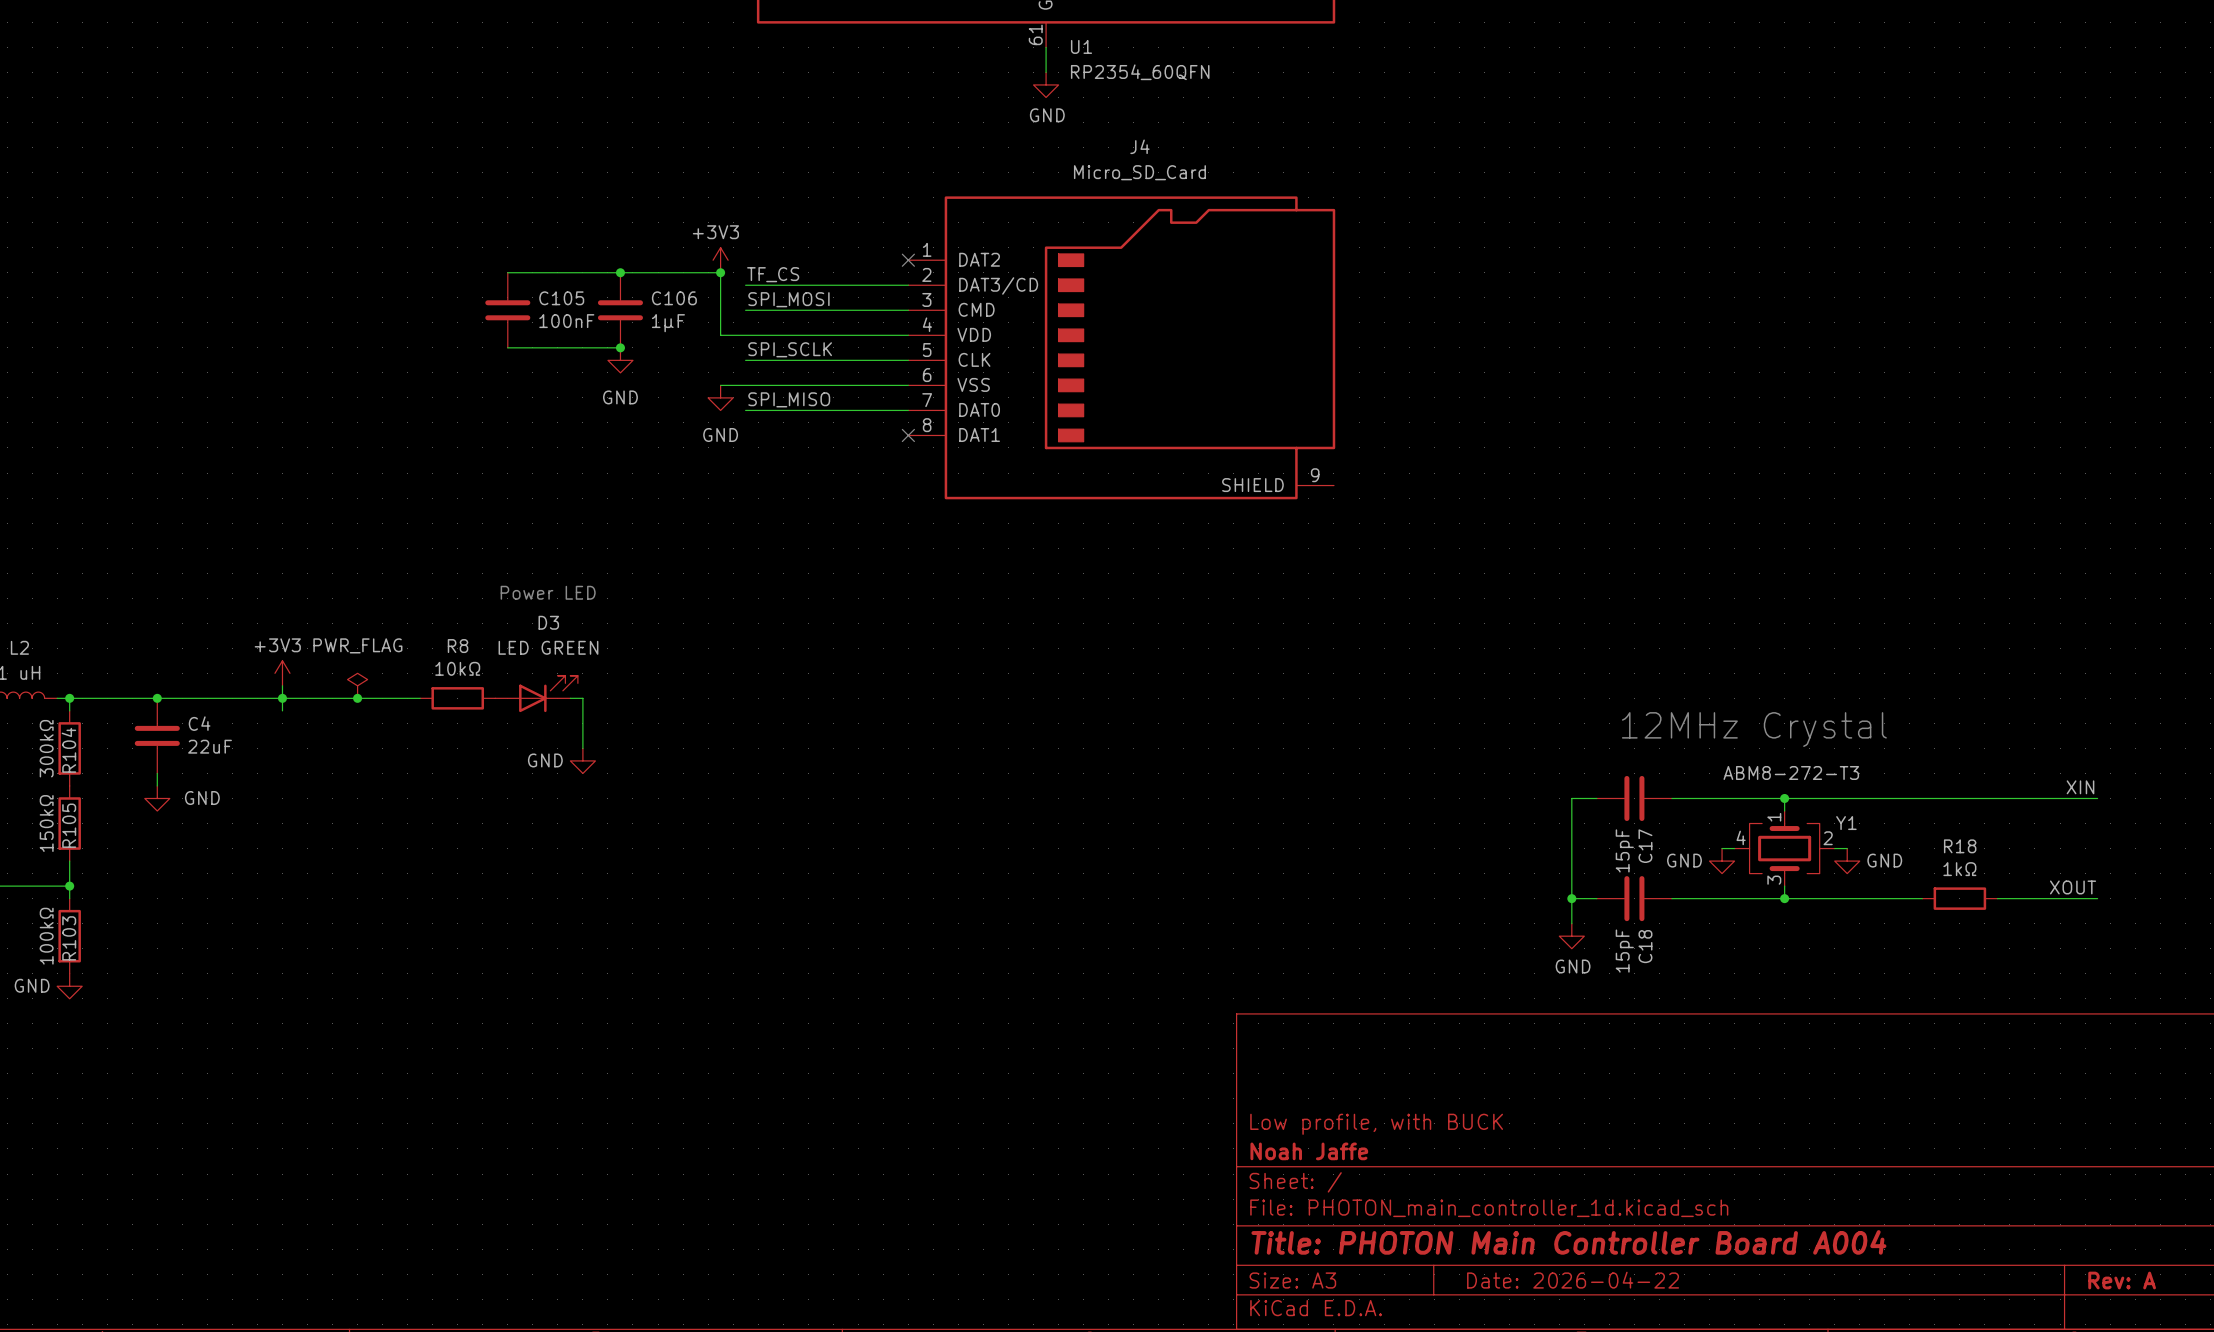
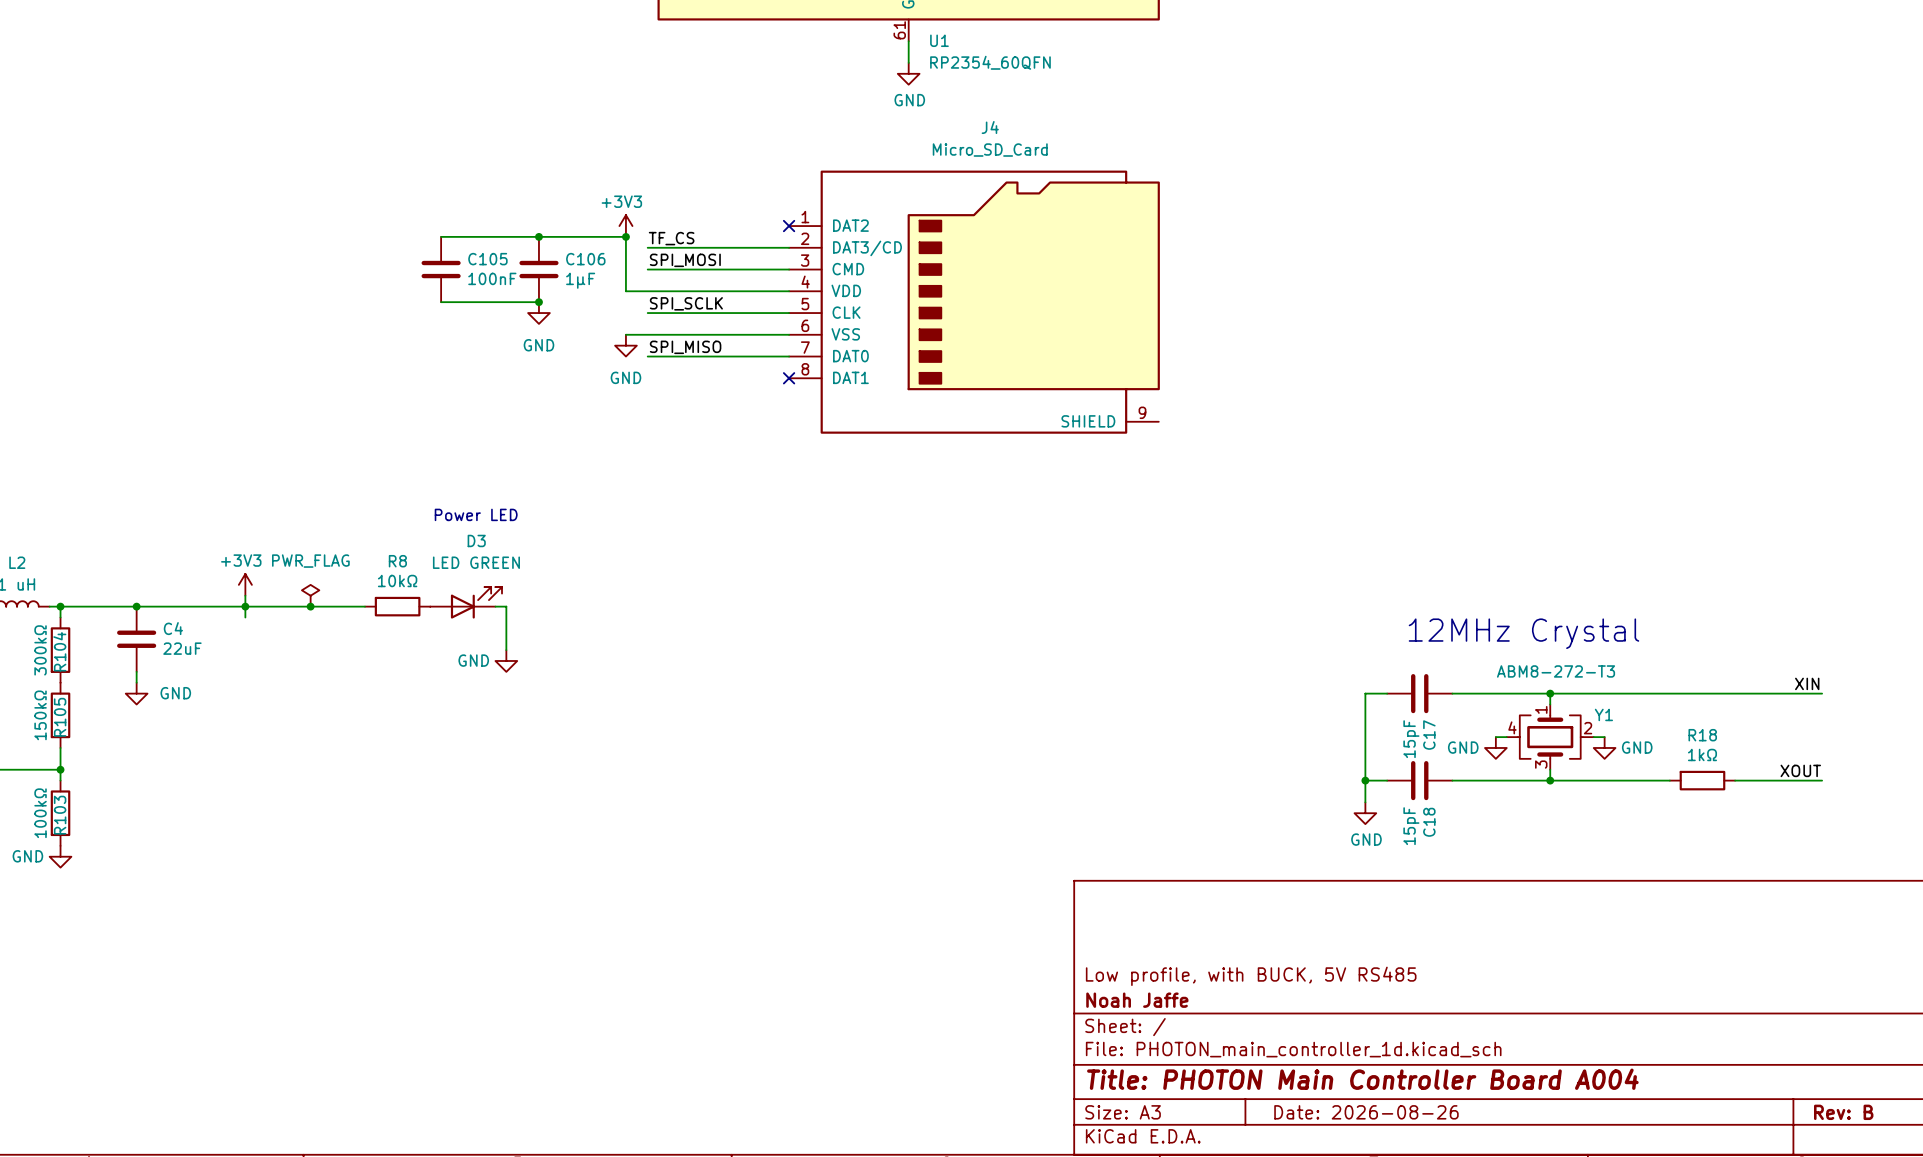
title block: Low profile, with BUCK (1376, 1124) -> Low profile, with BUCK, 5V RS485 (1251, 976)
title block: Date: 2026-04-22 (1573, 1280) -> Date: 2026-08-26 (1366, 1112)
title block: Rev: A (2122, 1280) -> Rev: B (1843, 1112)

